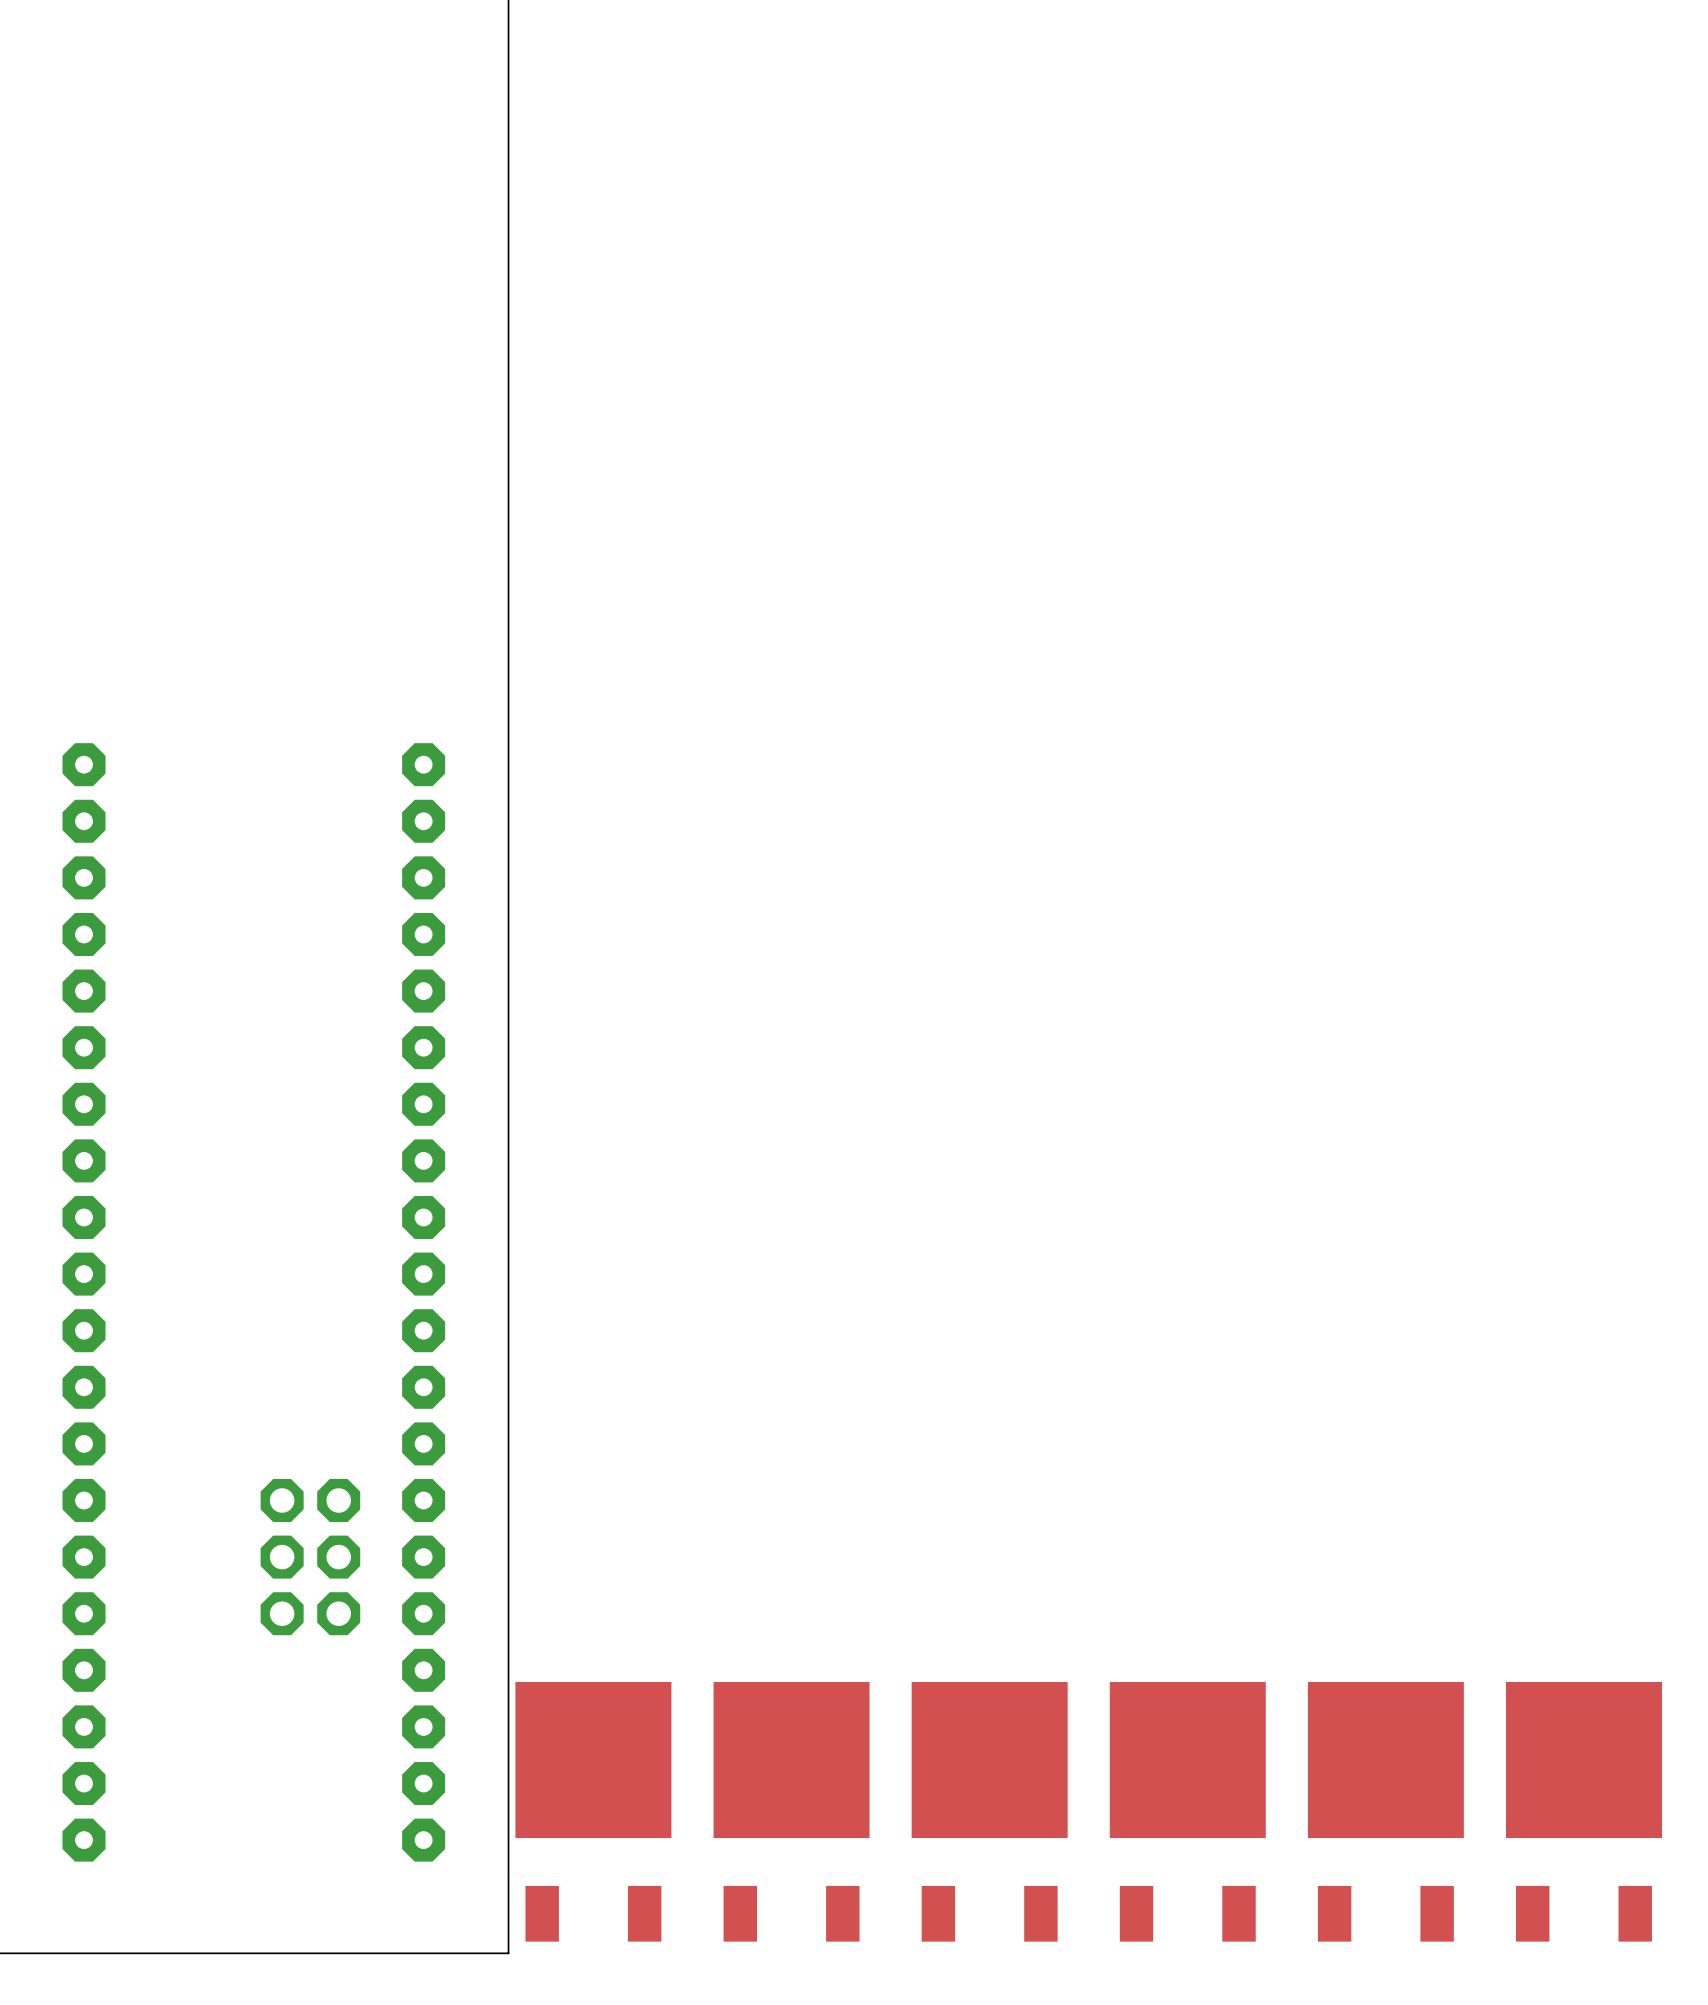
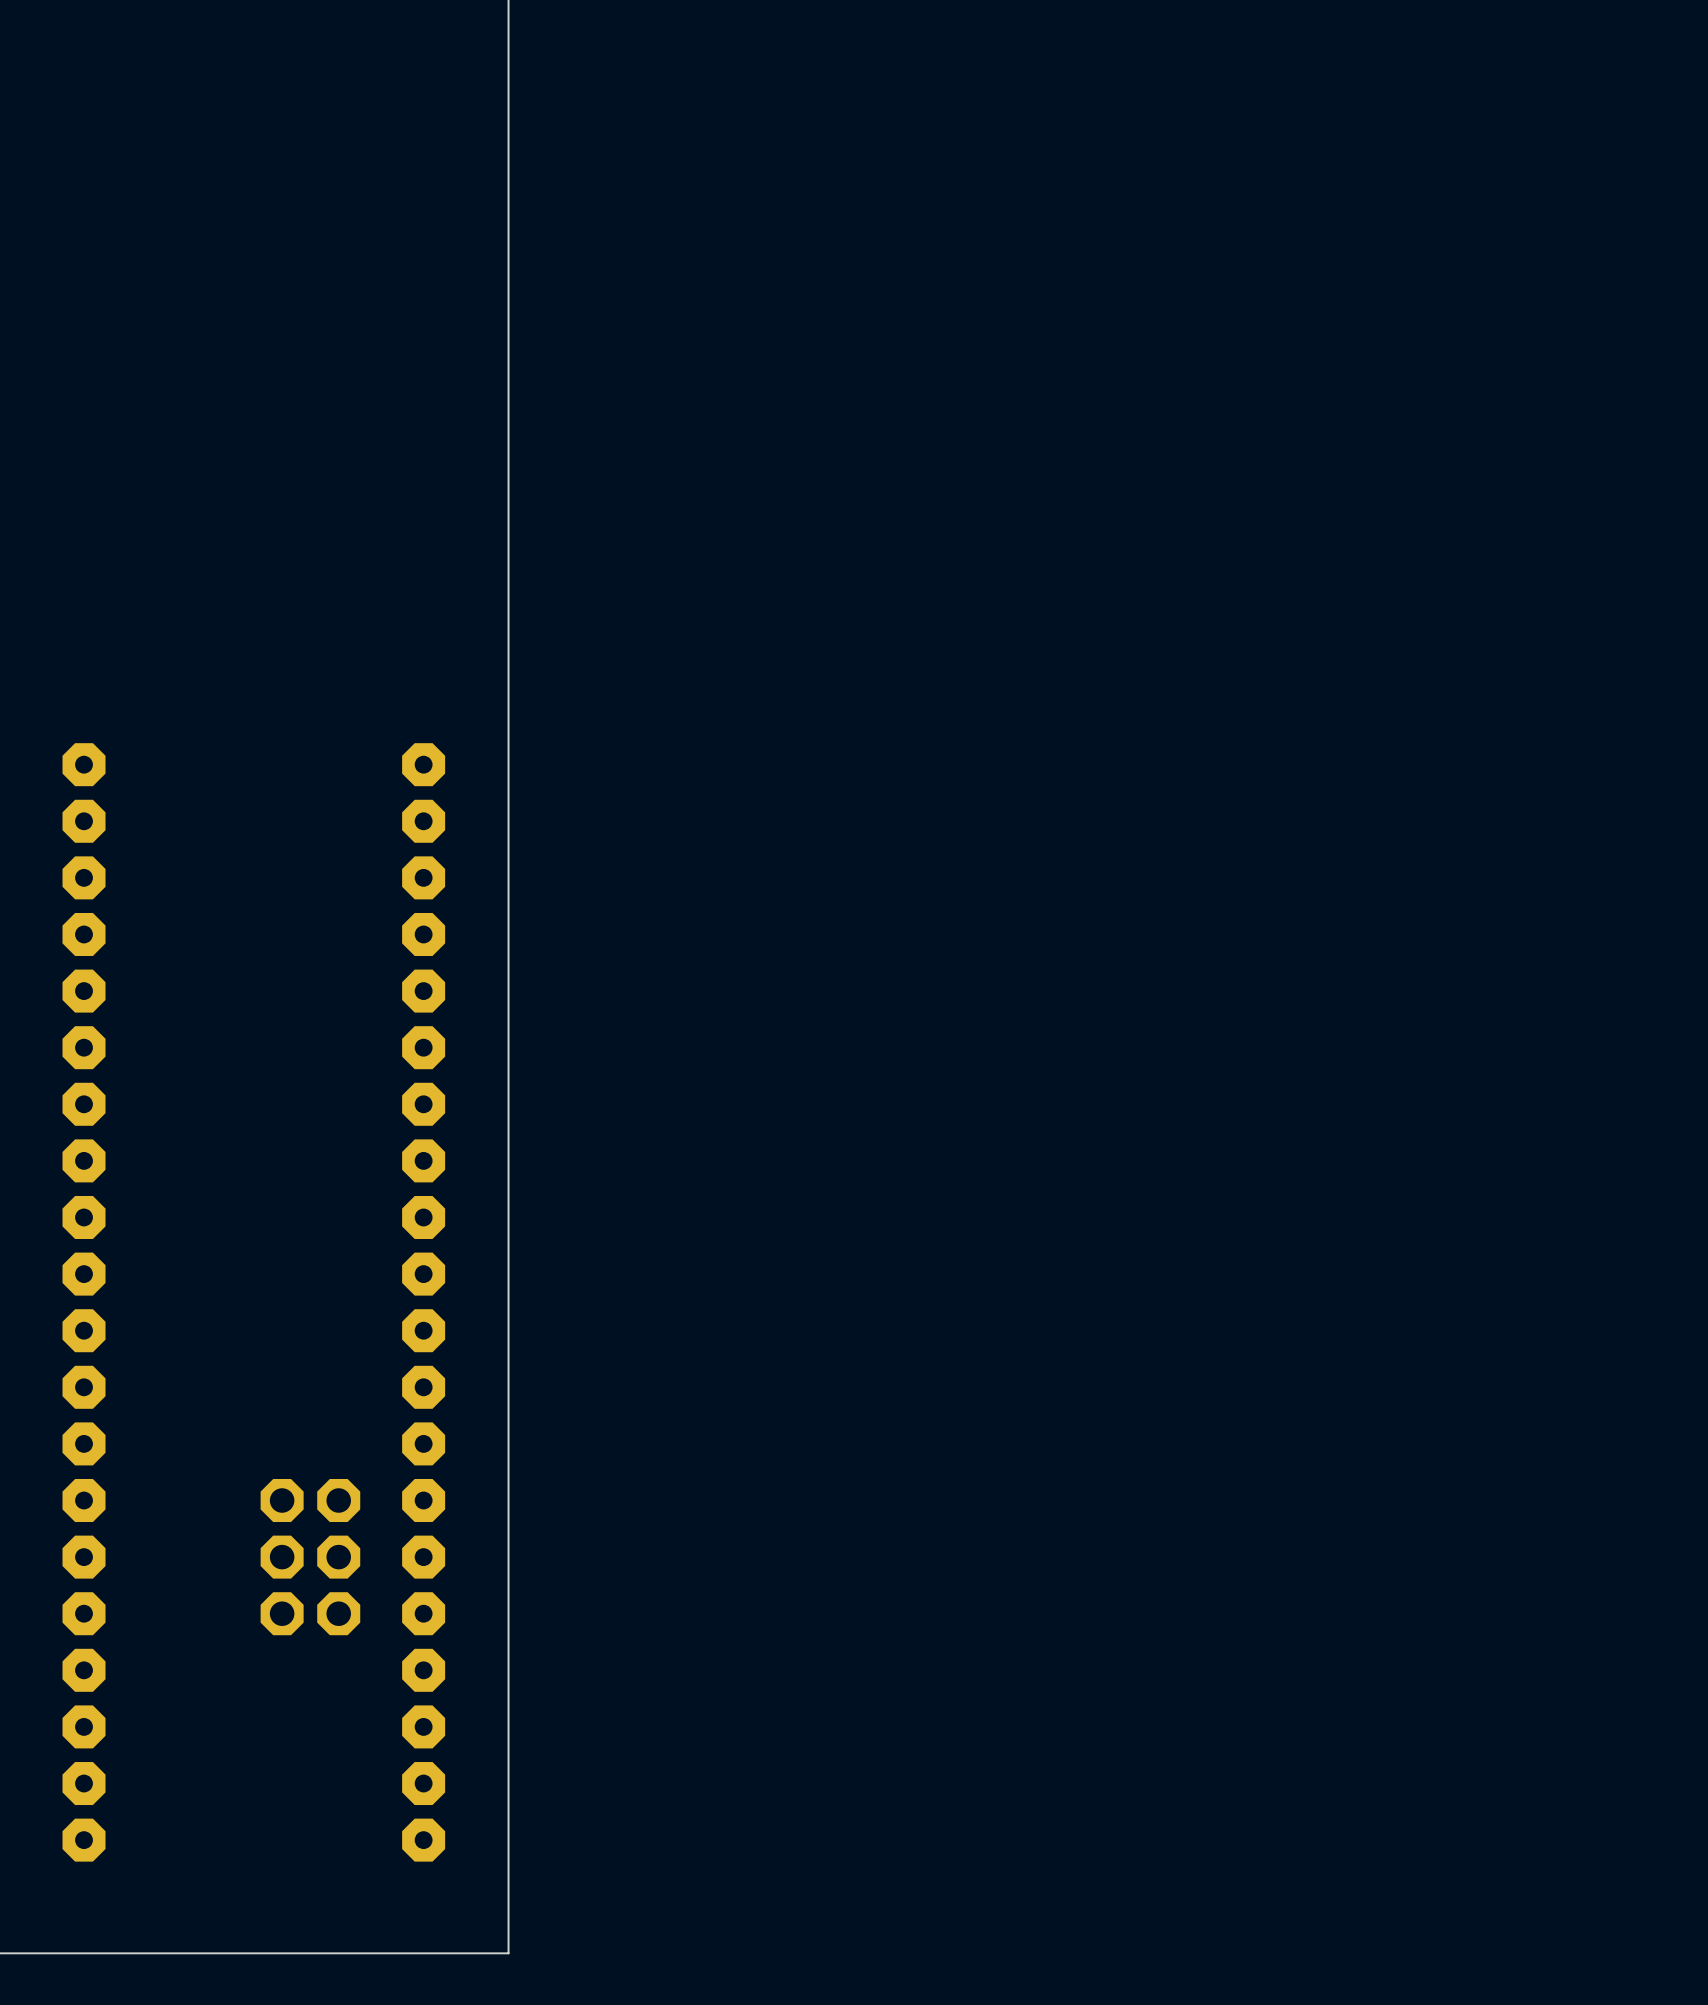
part: (593, 1811) -> none
part: (791, 1811) -> none
part: (989, 1811) -> none
part: (1187, 1811) -> none
part: (1385, 1811) -> none
part: (1583, 1811) -> none

